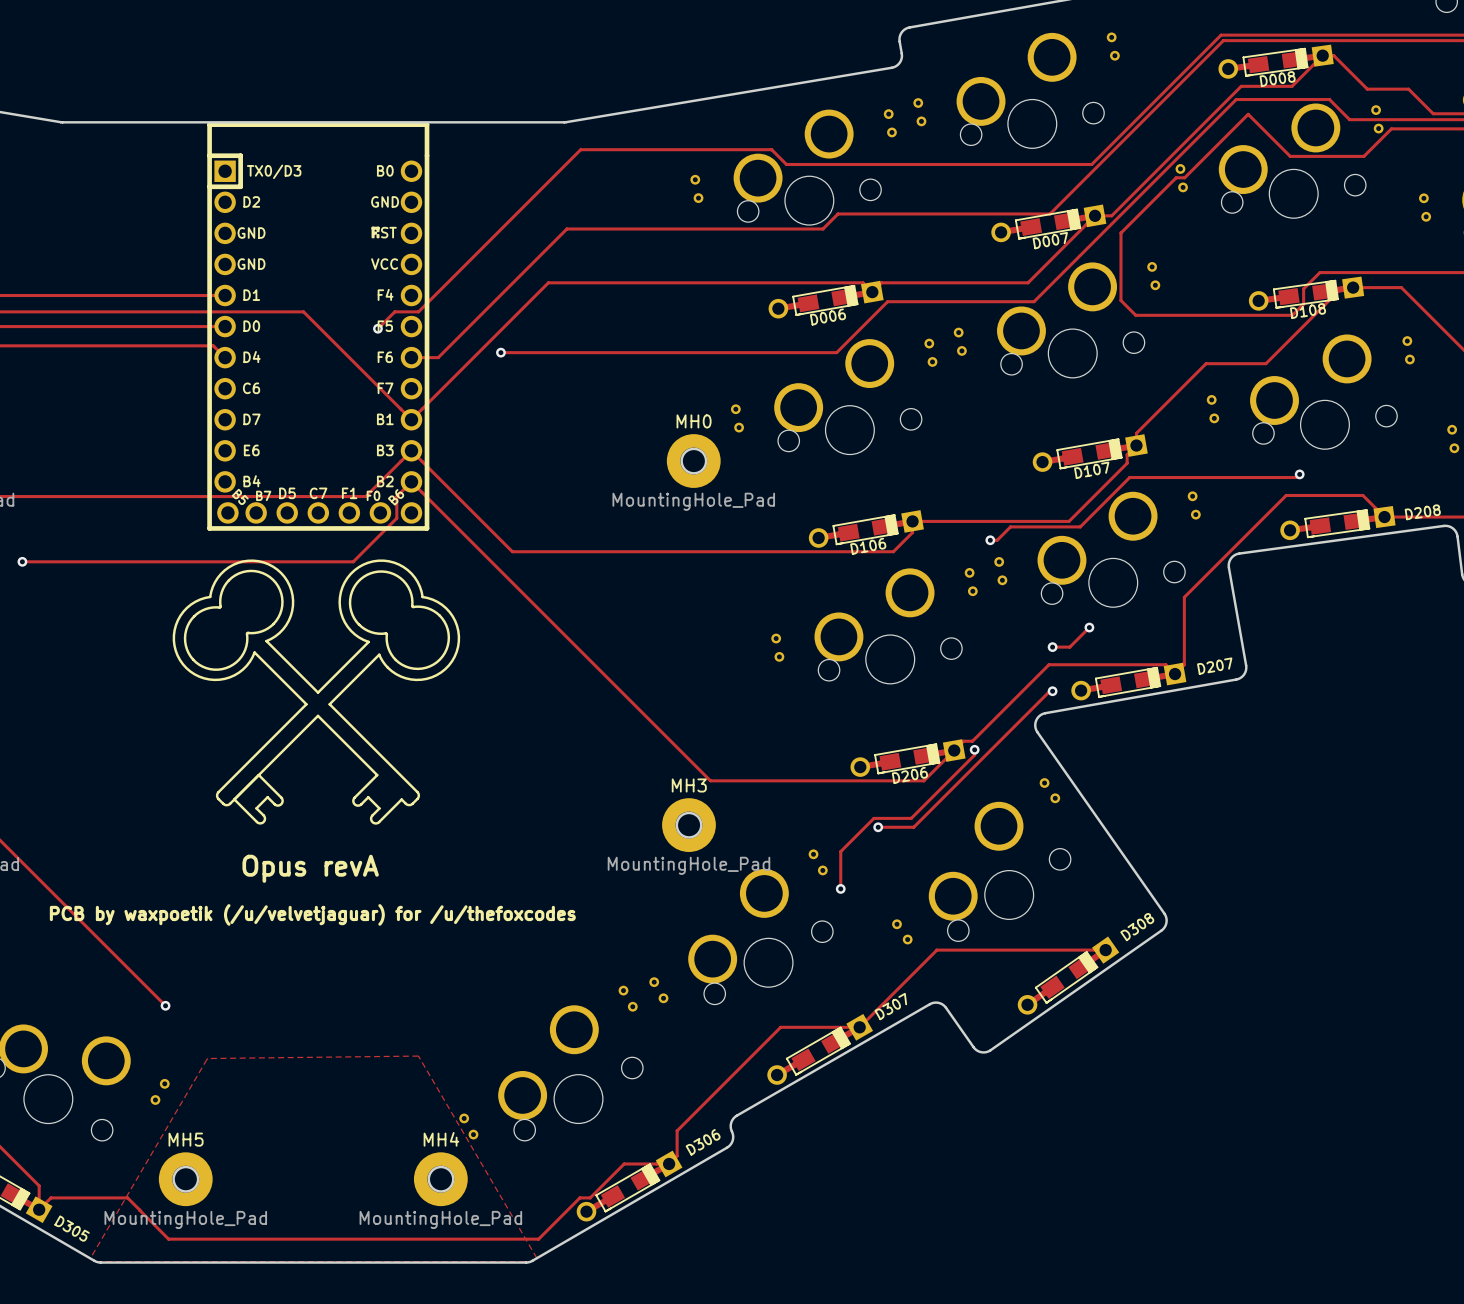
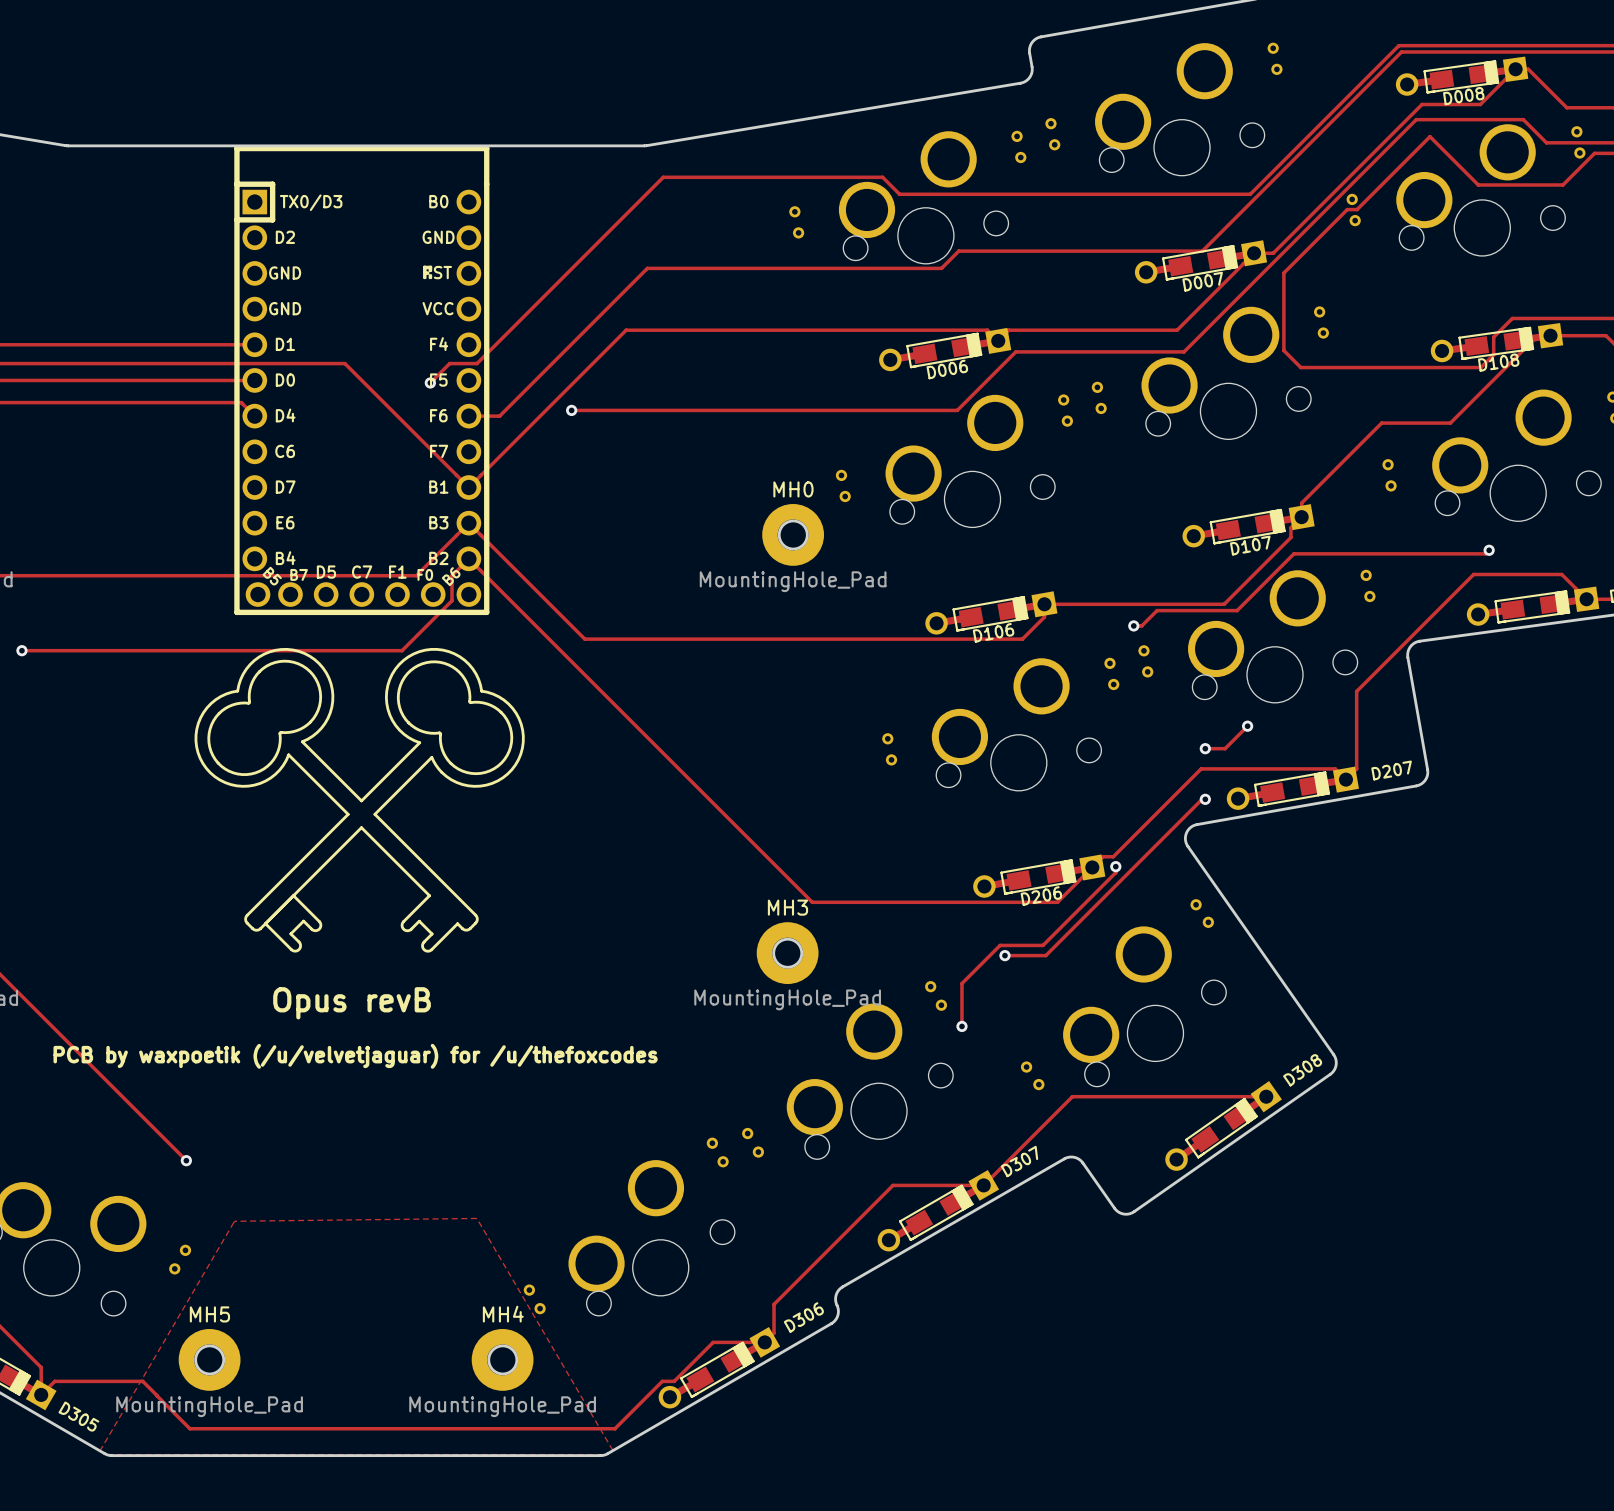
text: Opus revA (310, 868) -> Opus revB (352, 1003)

